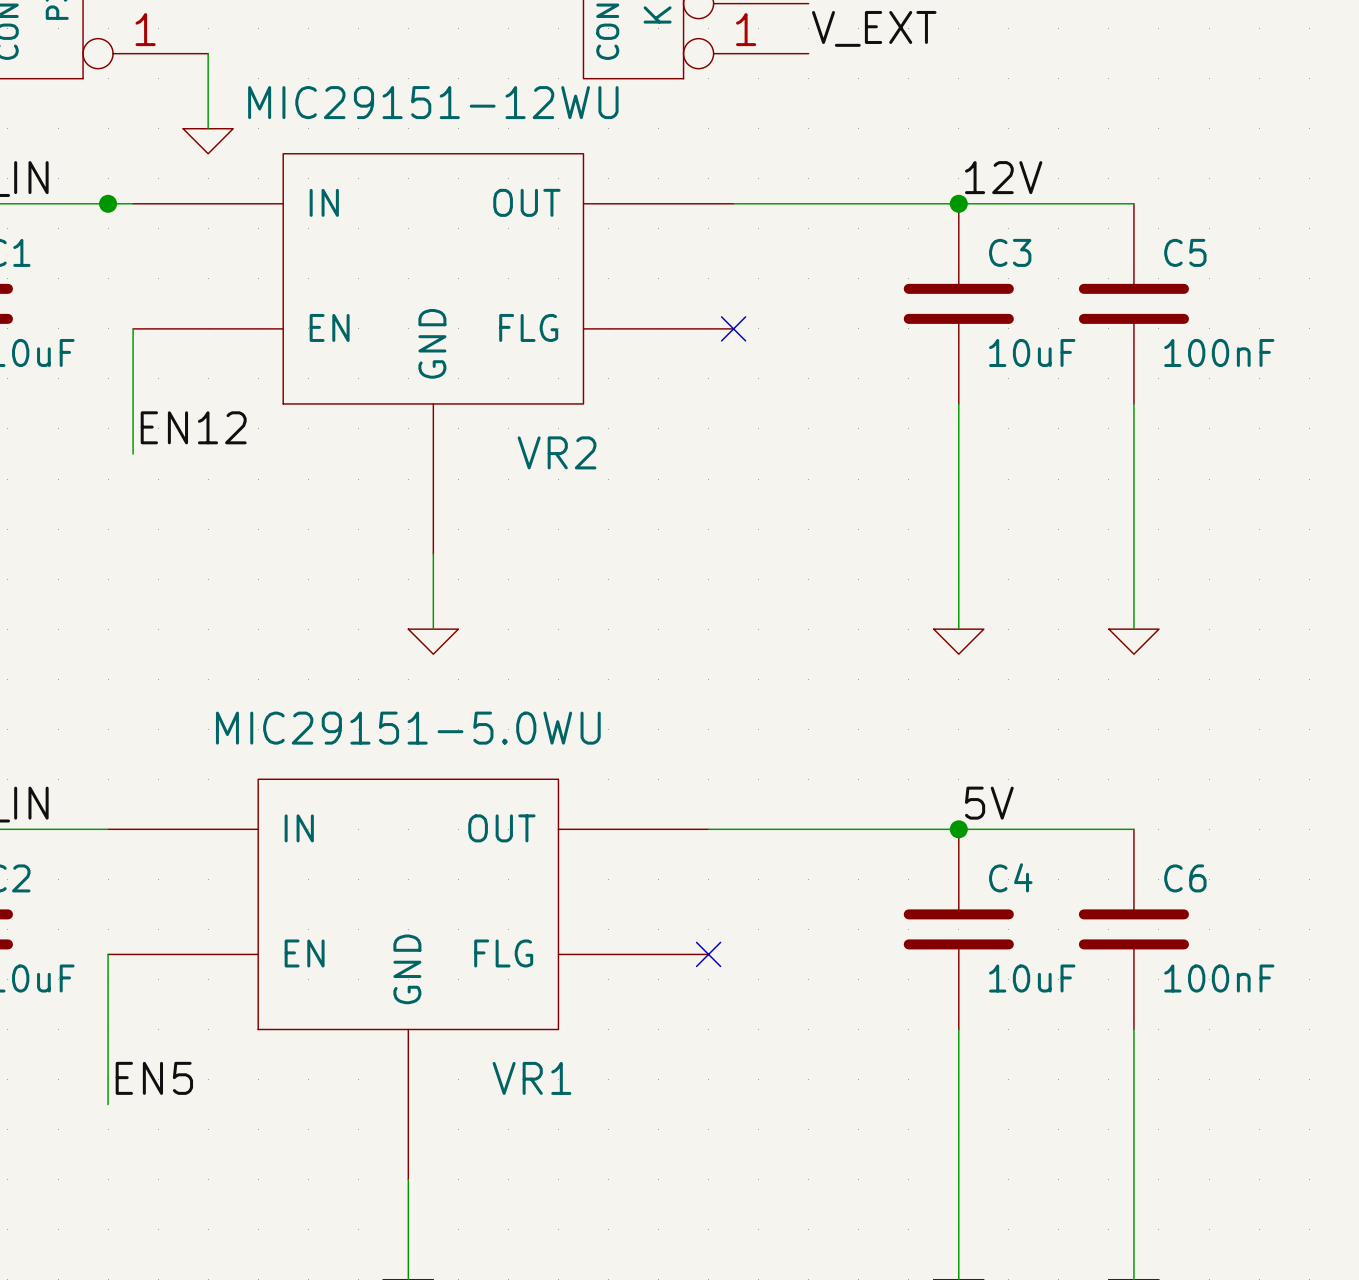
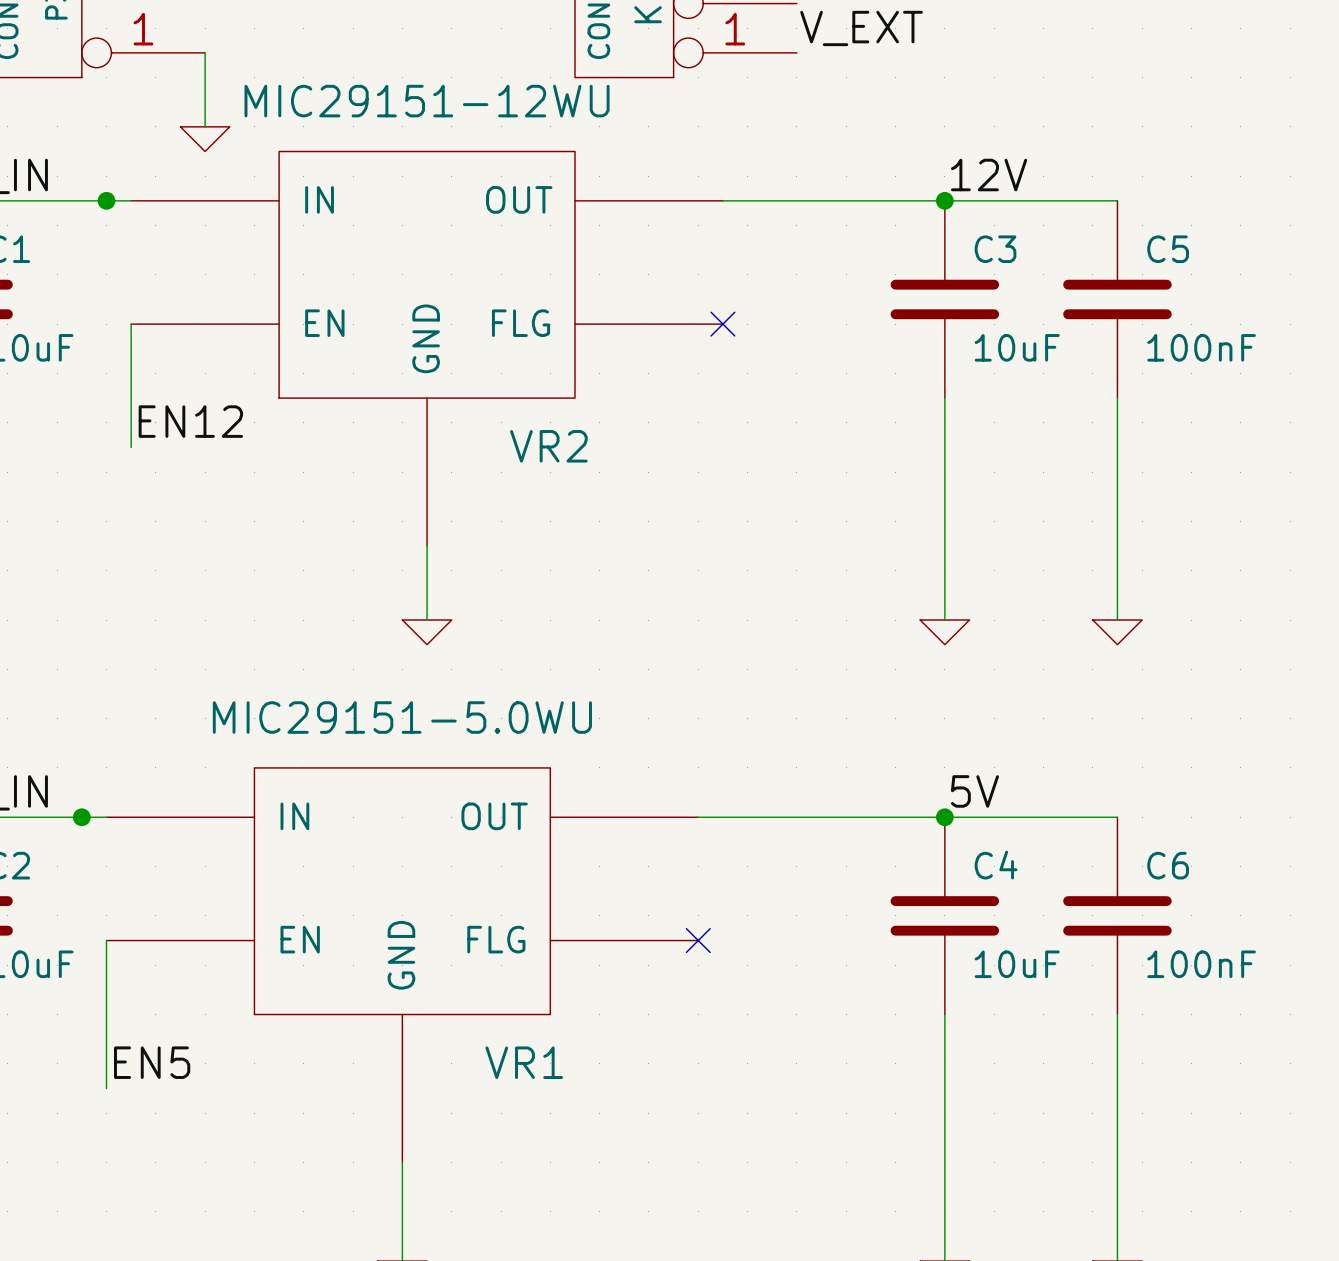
junction: none -> (81, 817)

